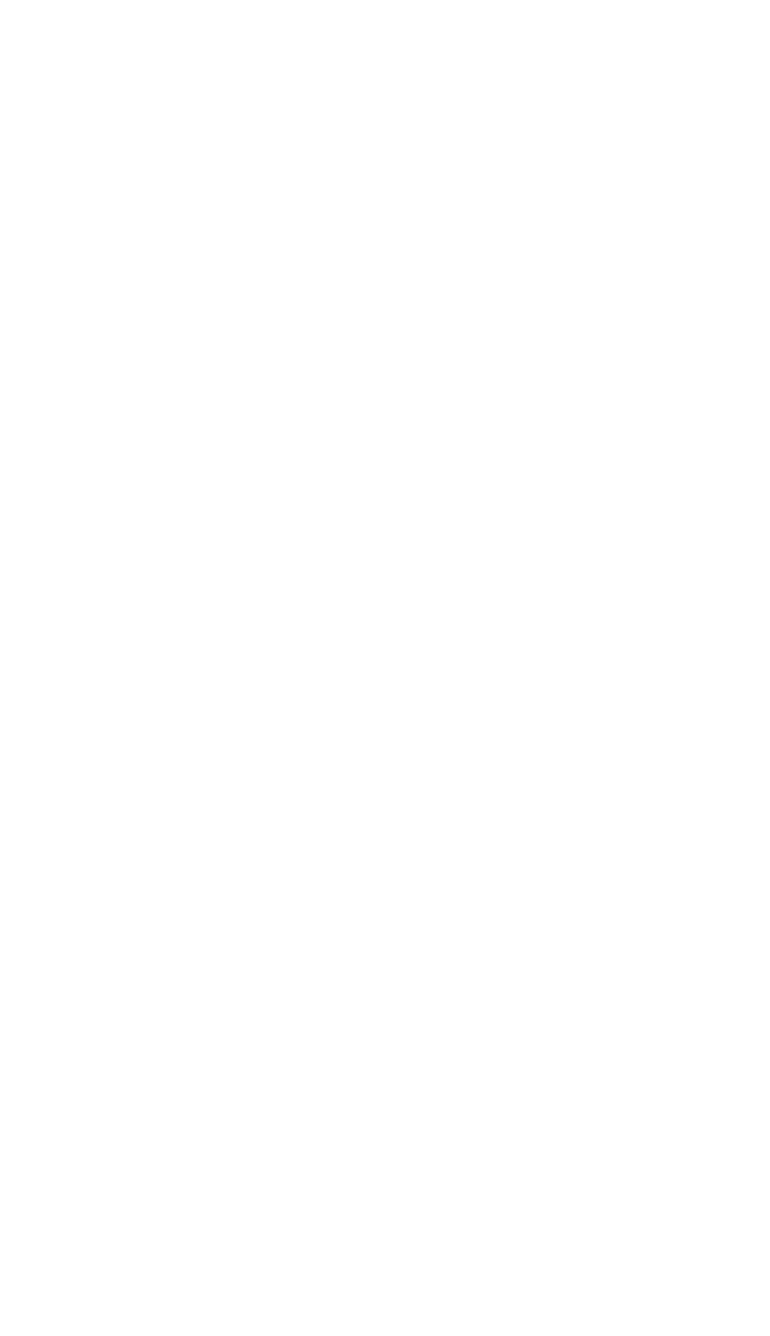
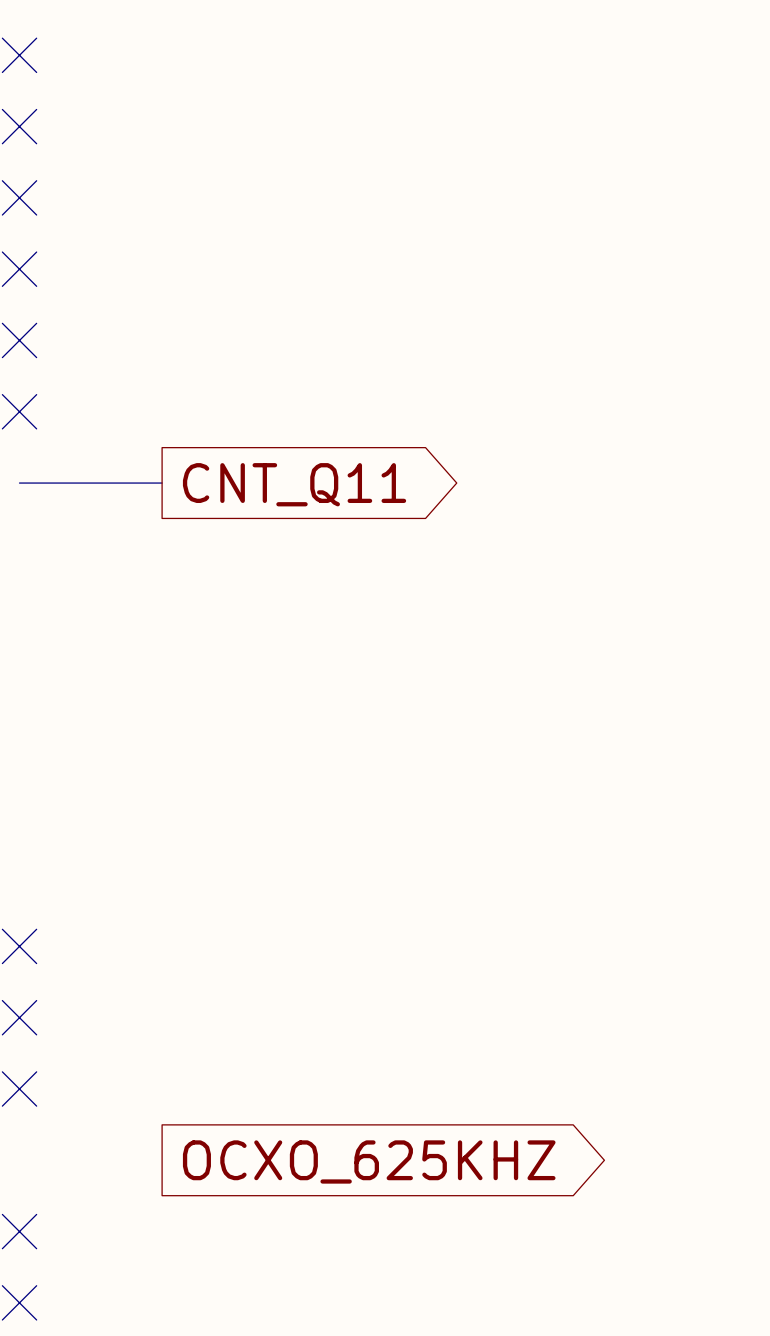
no-connect mark: none -> (19, 55)
no-connect mark: none -> (19, 126)
no-connect mark: none -> (19, 197)
no-connect mark: none -> (19, 269)
no-connect mark: none -> (19, 340)
no-connect mark: none -> (19, 411)
wire: none -> (19, 483) (162, 483)
global label: none -> CNT_Q11 (294, 484)
no-connect mark: none -> (19, 946)
no-connect mark: none -> (19, 1017)
no-connect mark: none -> (19, 1088)
global label: none -> OCXO_625KHZ (369, 1161)
no-connect mark: none -> (19, 1231)
no-connect mark: none -> (19, 1302)

